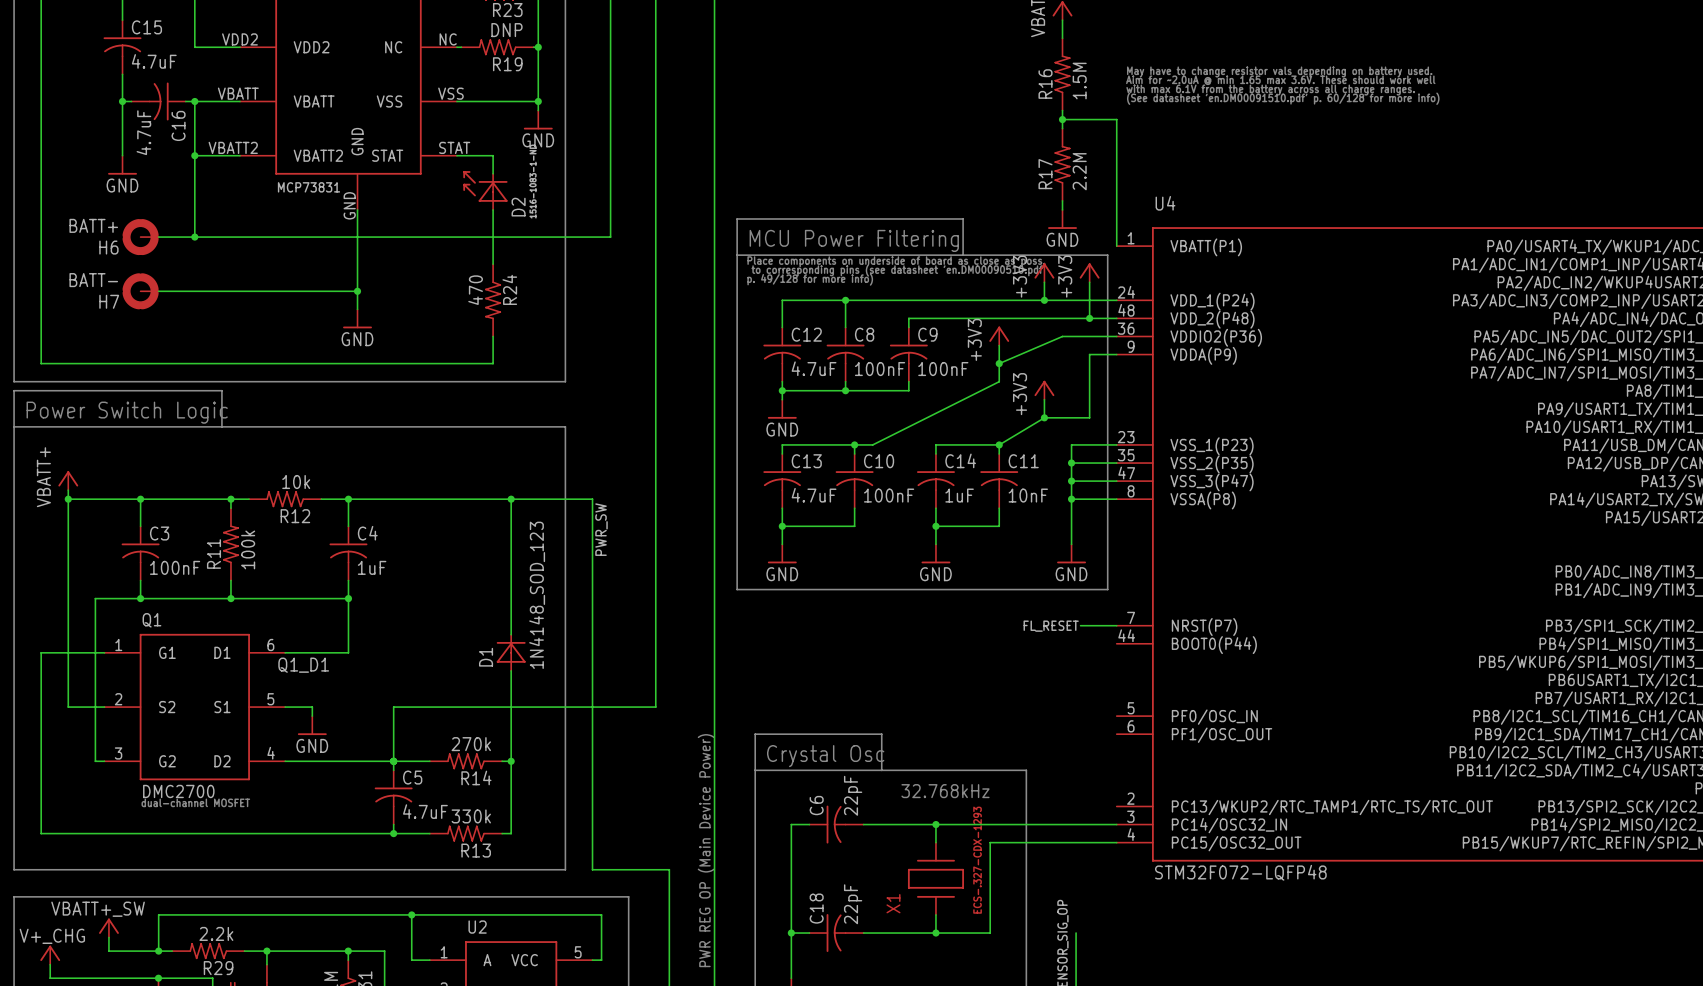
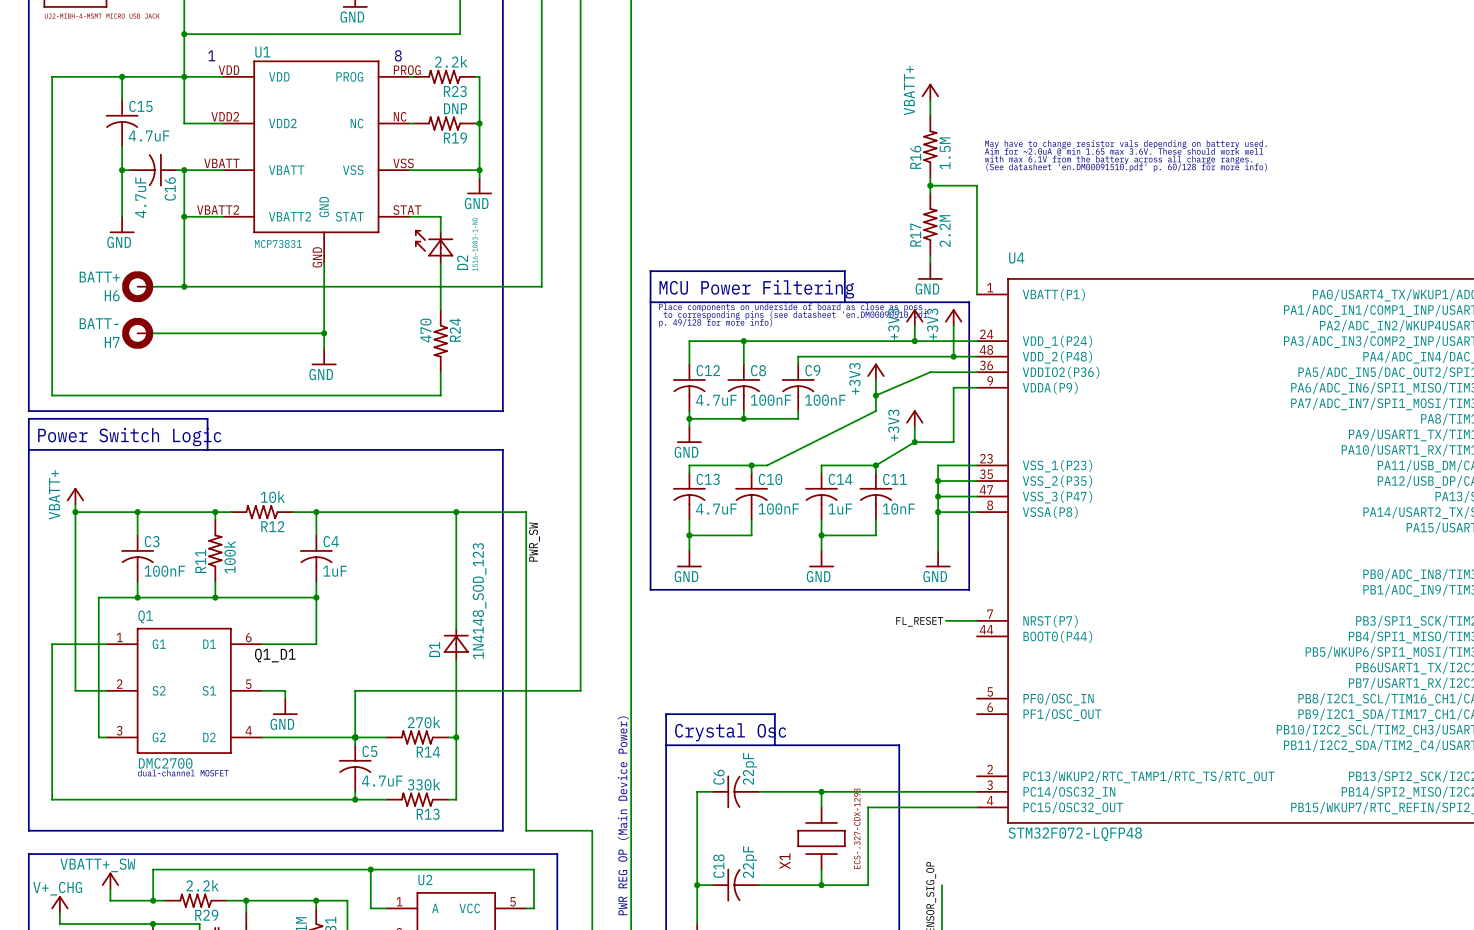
text: 32.768kHz (945, 791) -> none

